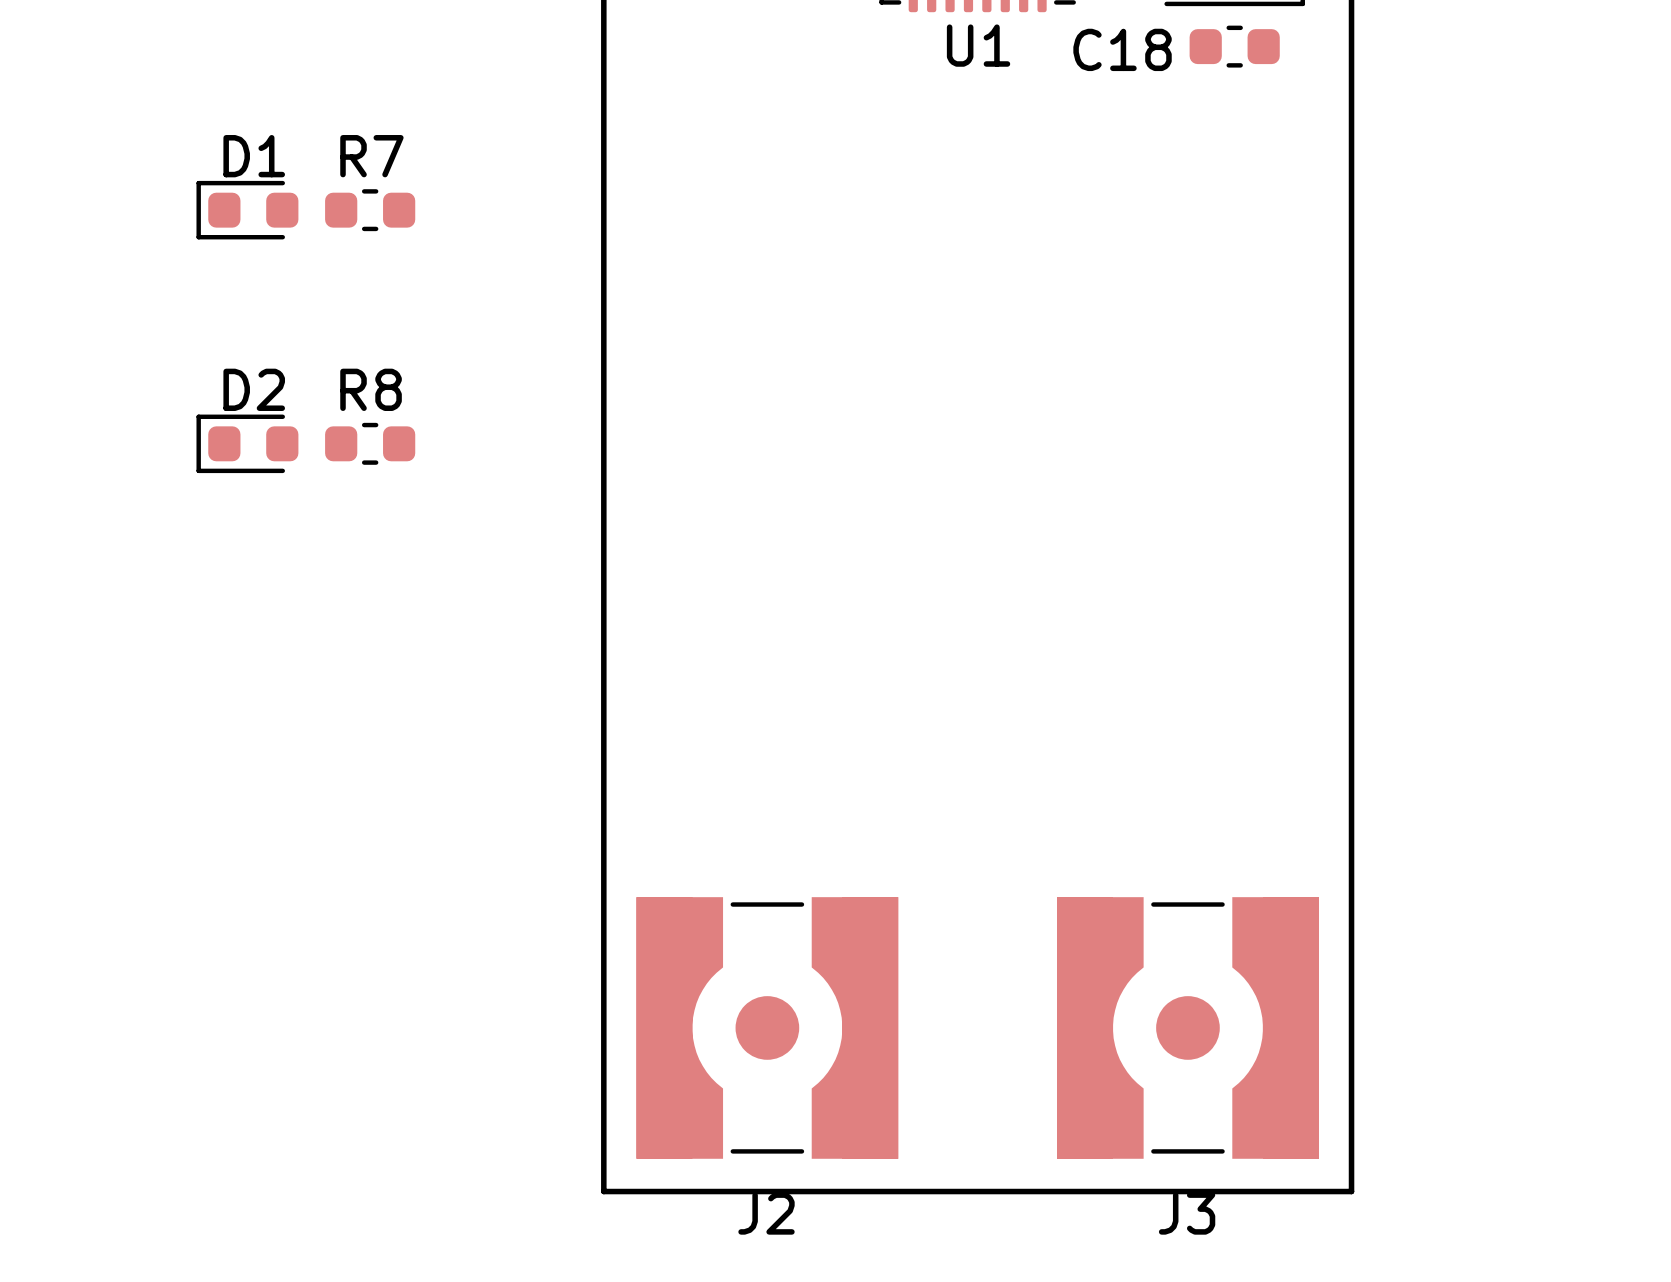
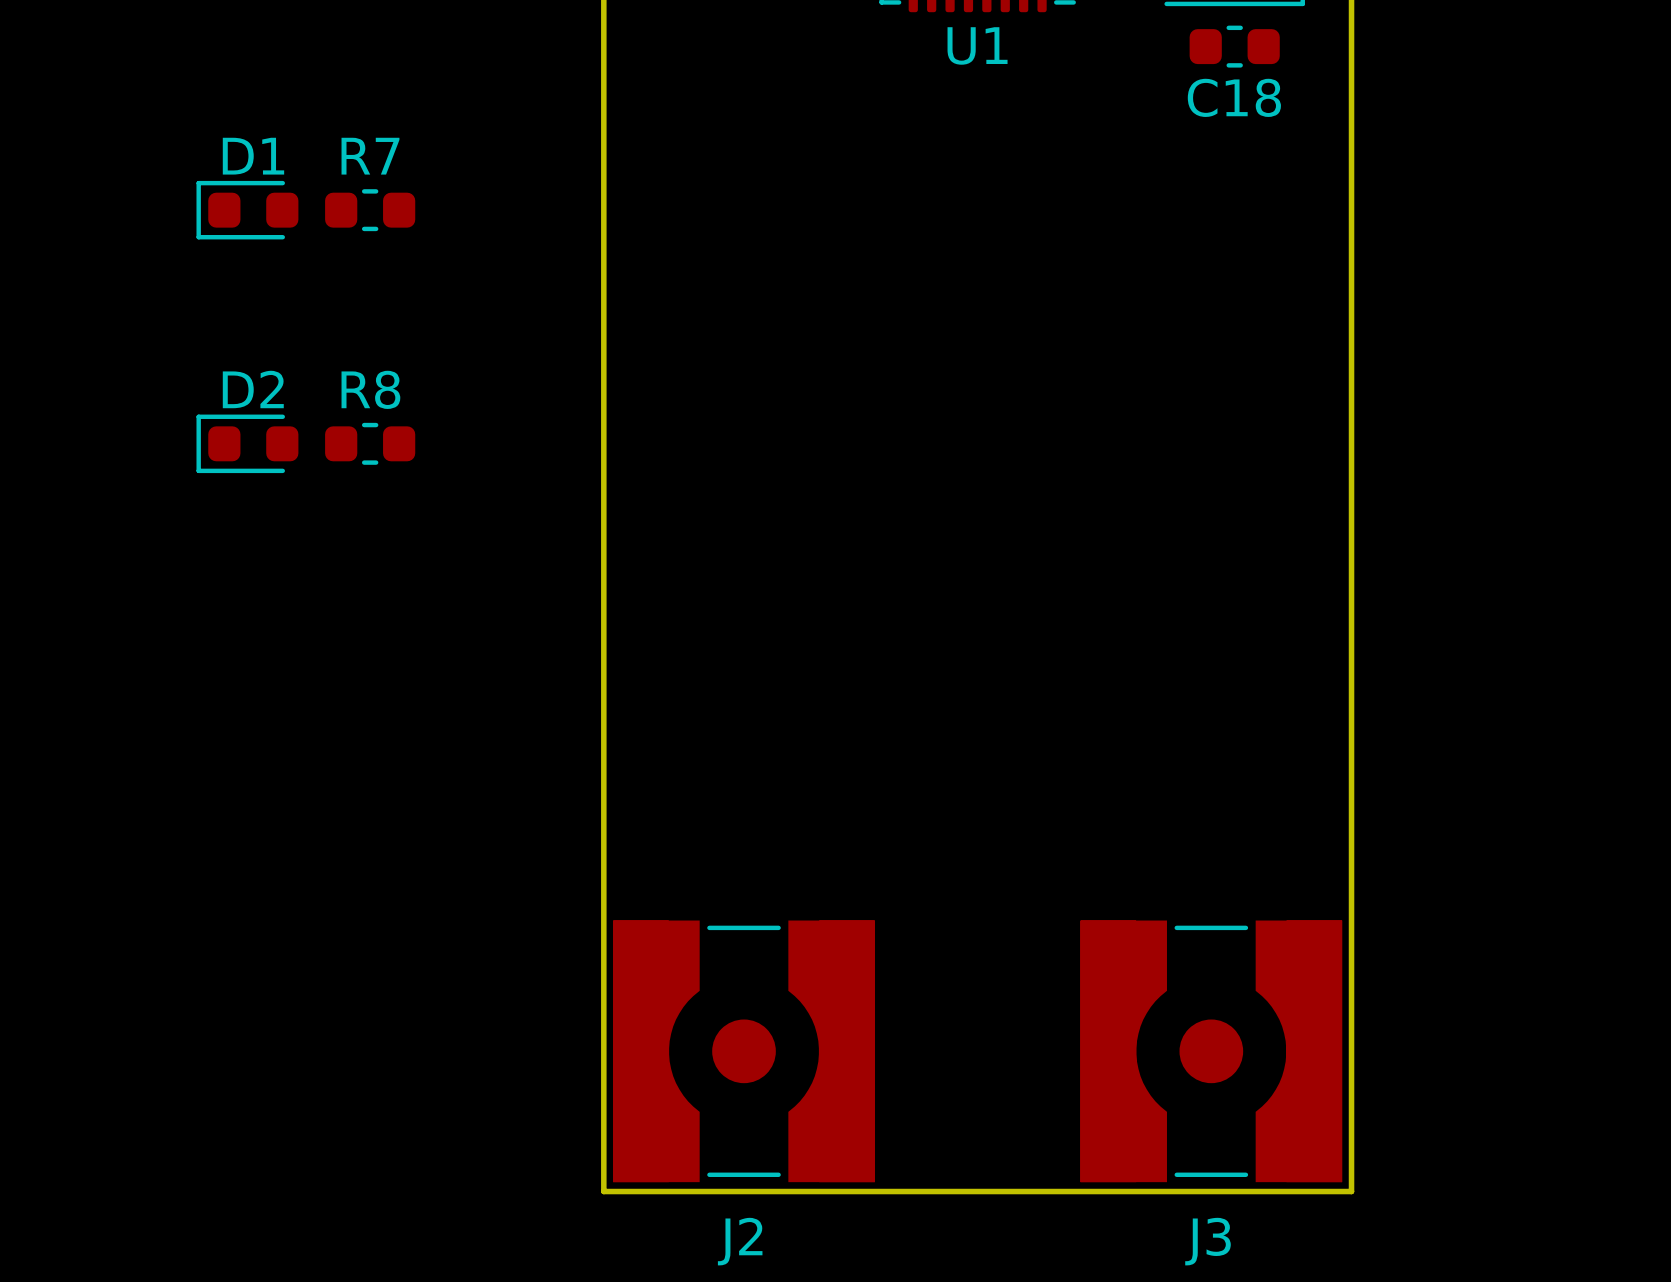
C18 name position: C18 (1122, 49) -> C18 (1234, 97)
J2 position: (767, 1027) -> (744, 1051)
J3 position: (1187, 1027) -> (1211, 1051)

